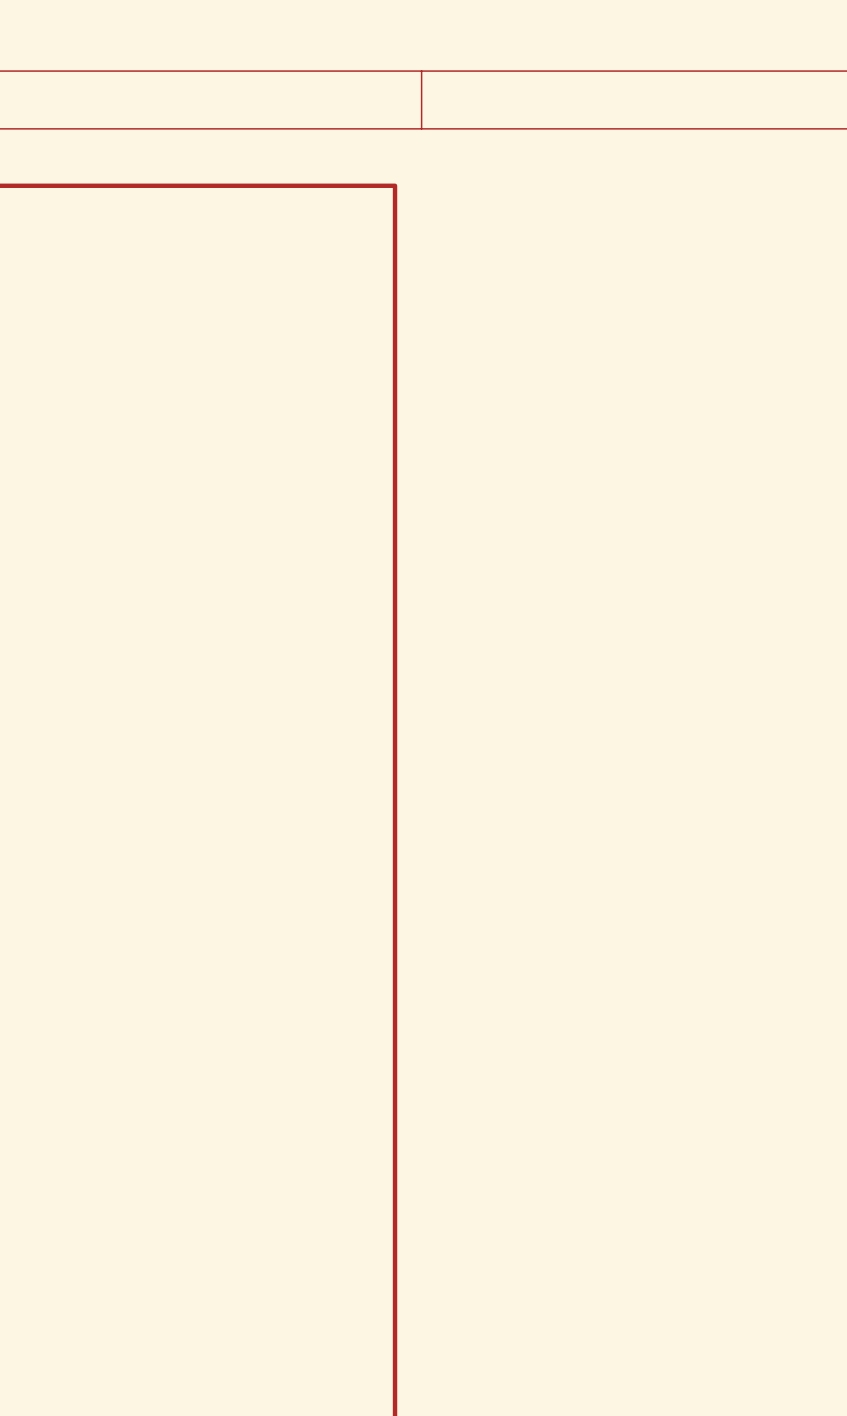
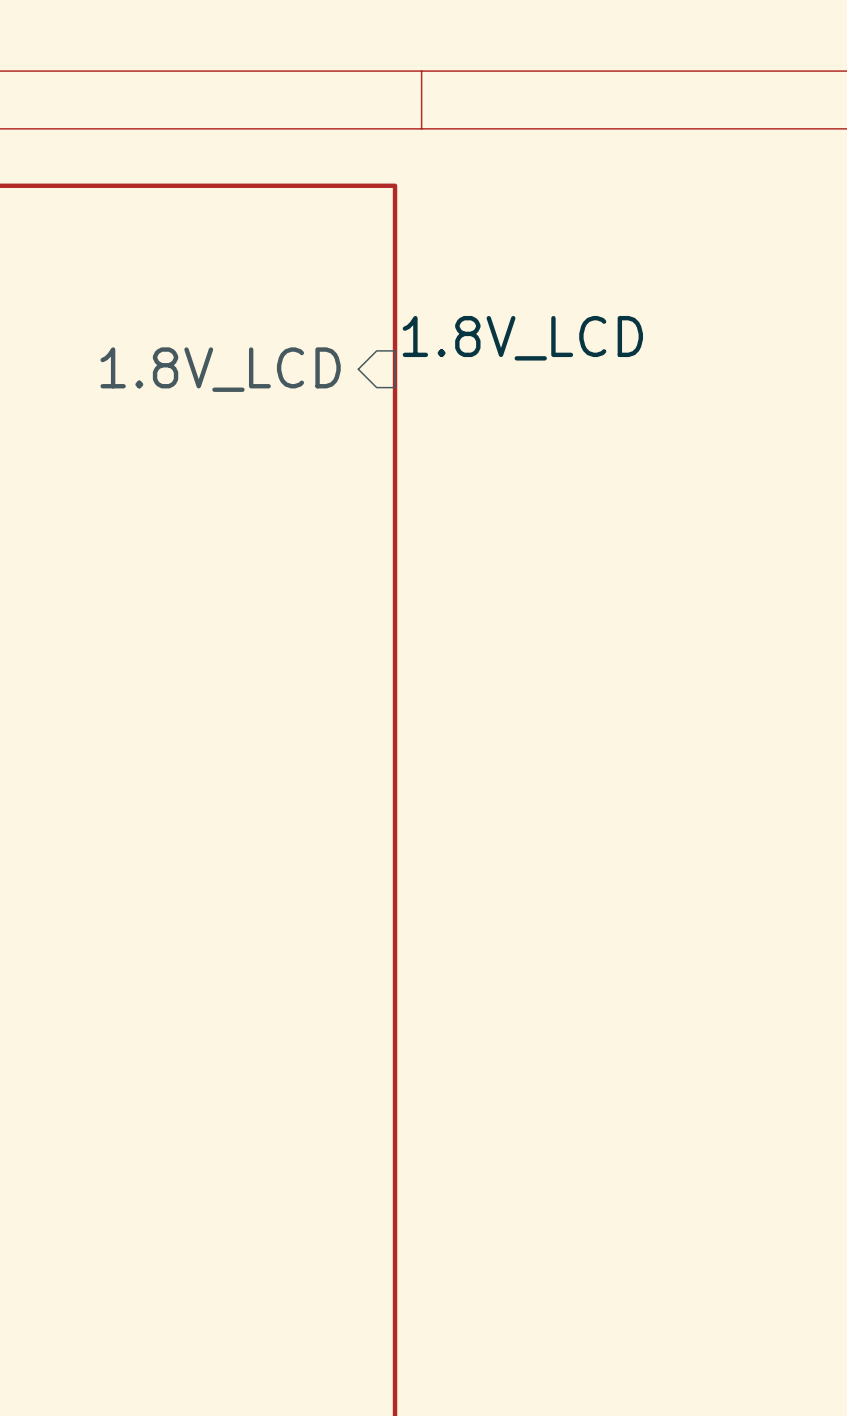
label: none -> 1.8V_LCD (522, 338)
sheet pin: none -> 1.8V_LCD (220, 369)

